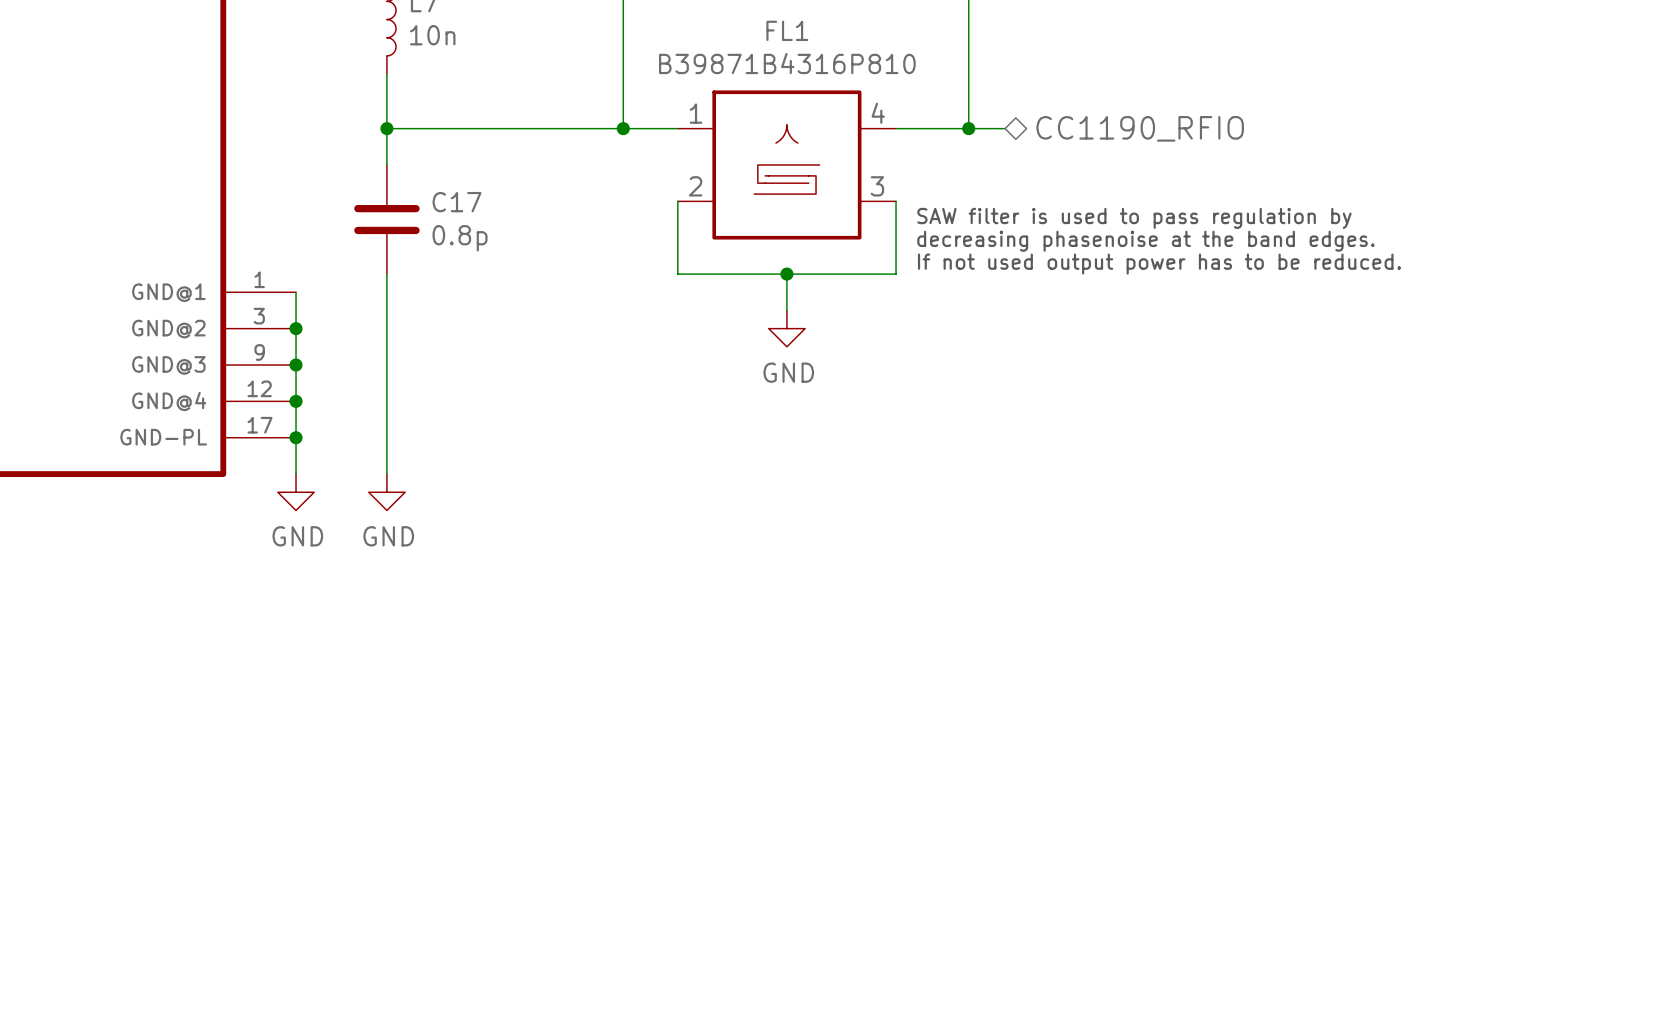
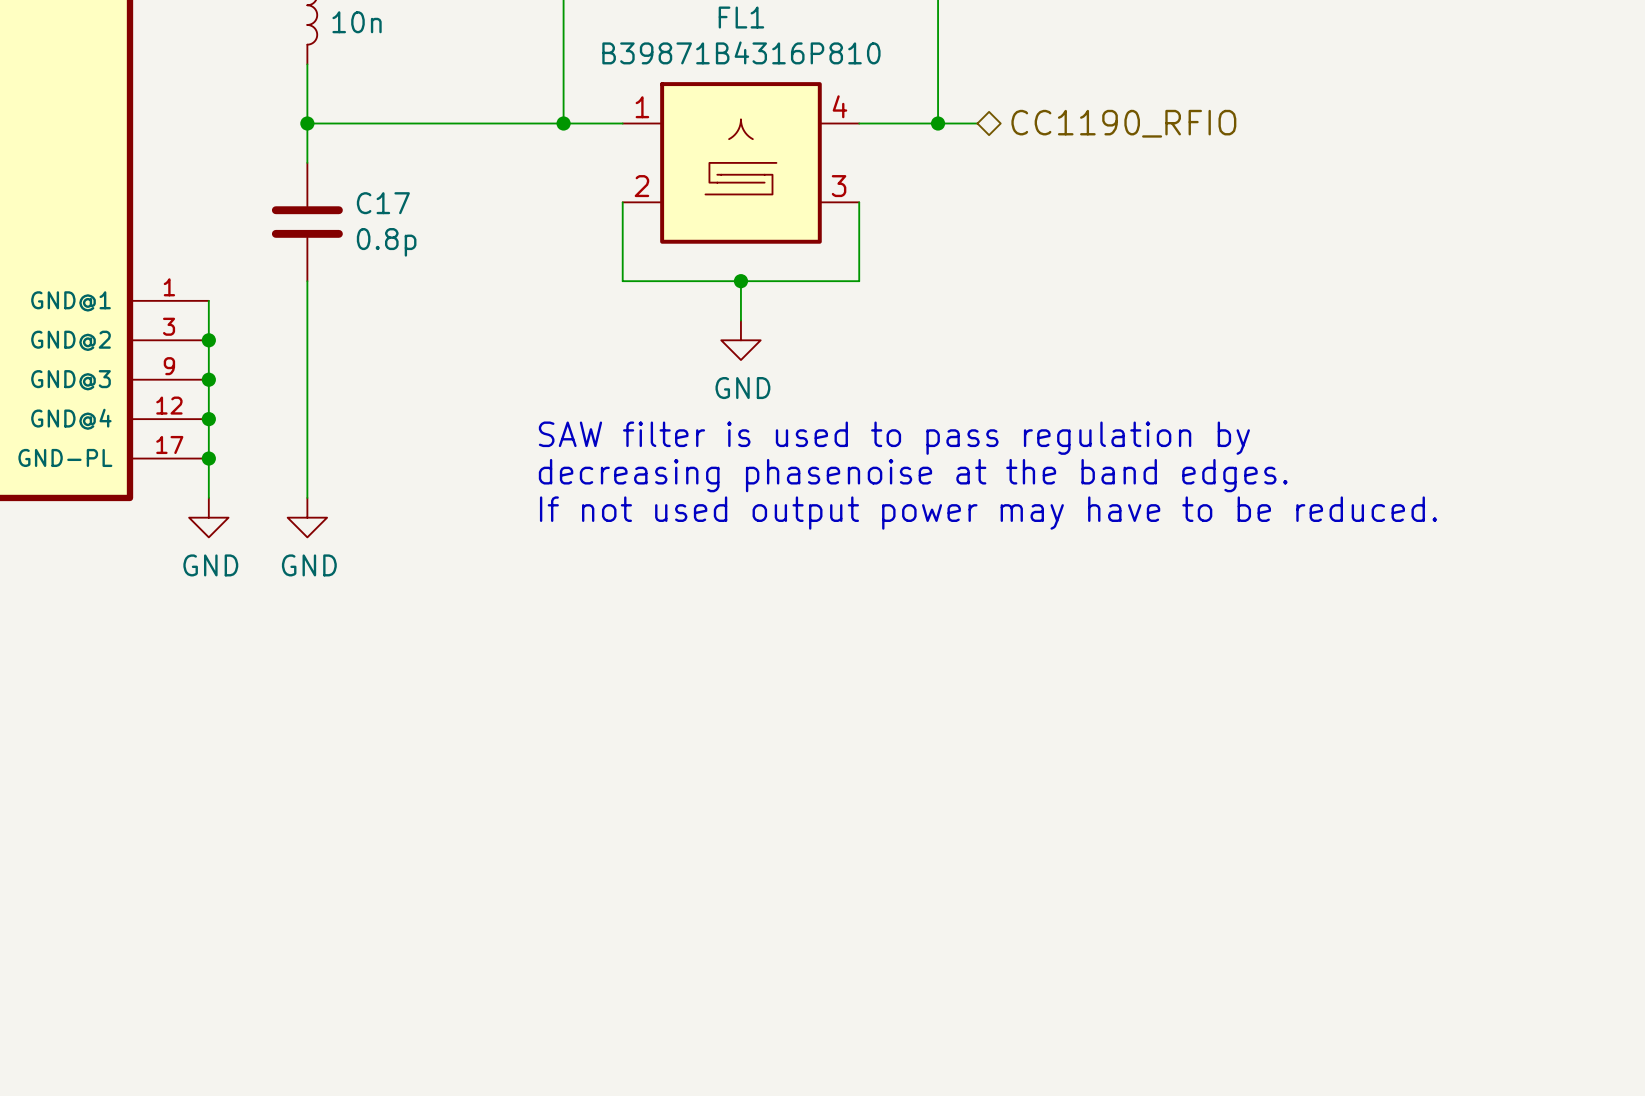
text: SAW filter is used to pass regulation by (1134, 218) -> none
text: decreasing phasenoise at the band edges. (1145, 241) -> none
text: If not used output power has to be reduced. (1159, 264) -> none
text: none -> SAW filter is used to pass regulation by (894, 438)
text: none -> decreasing phasenoise at the band edges. (913, 475)
text: none -> If not used output power may have to be reduced. (988, 513)

